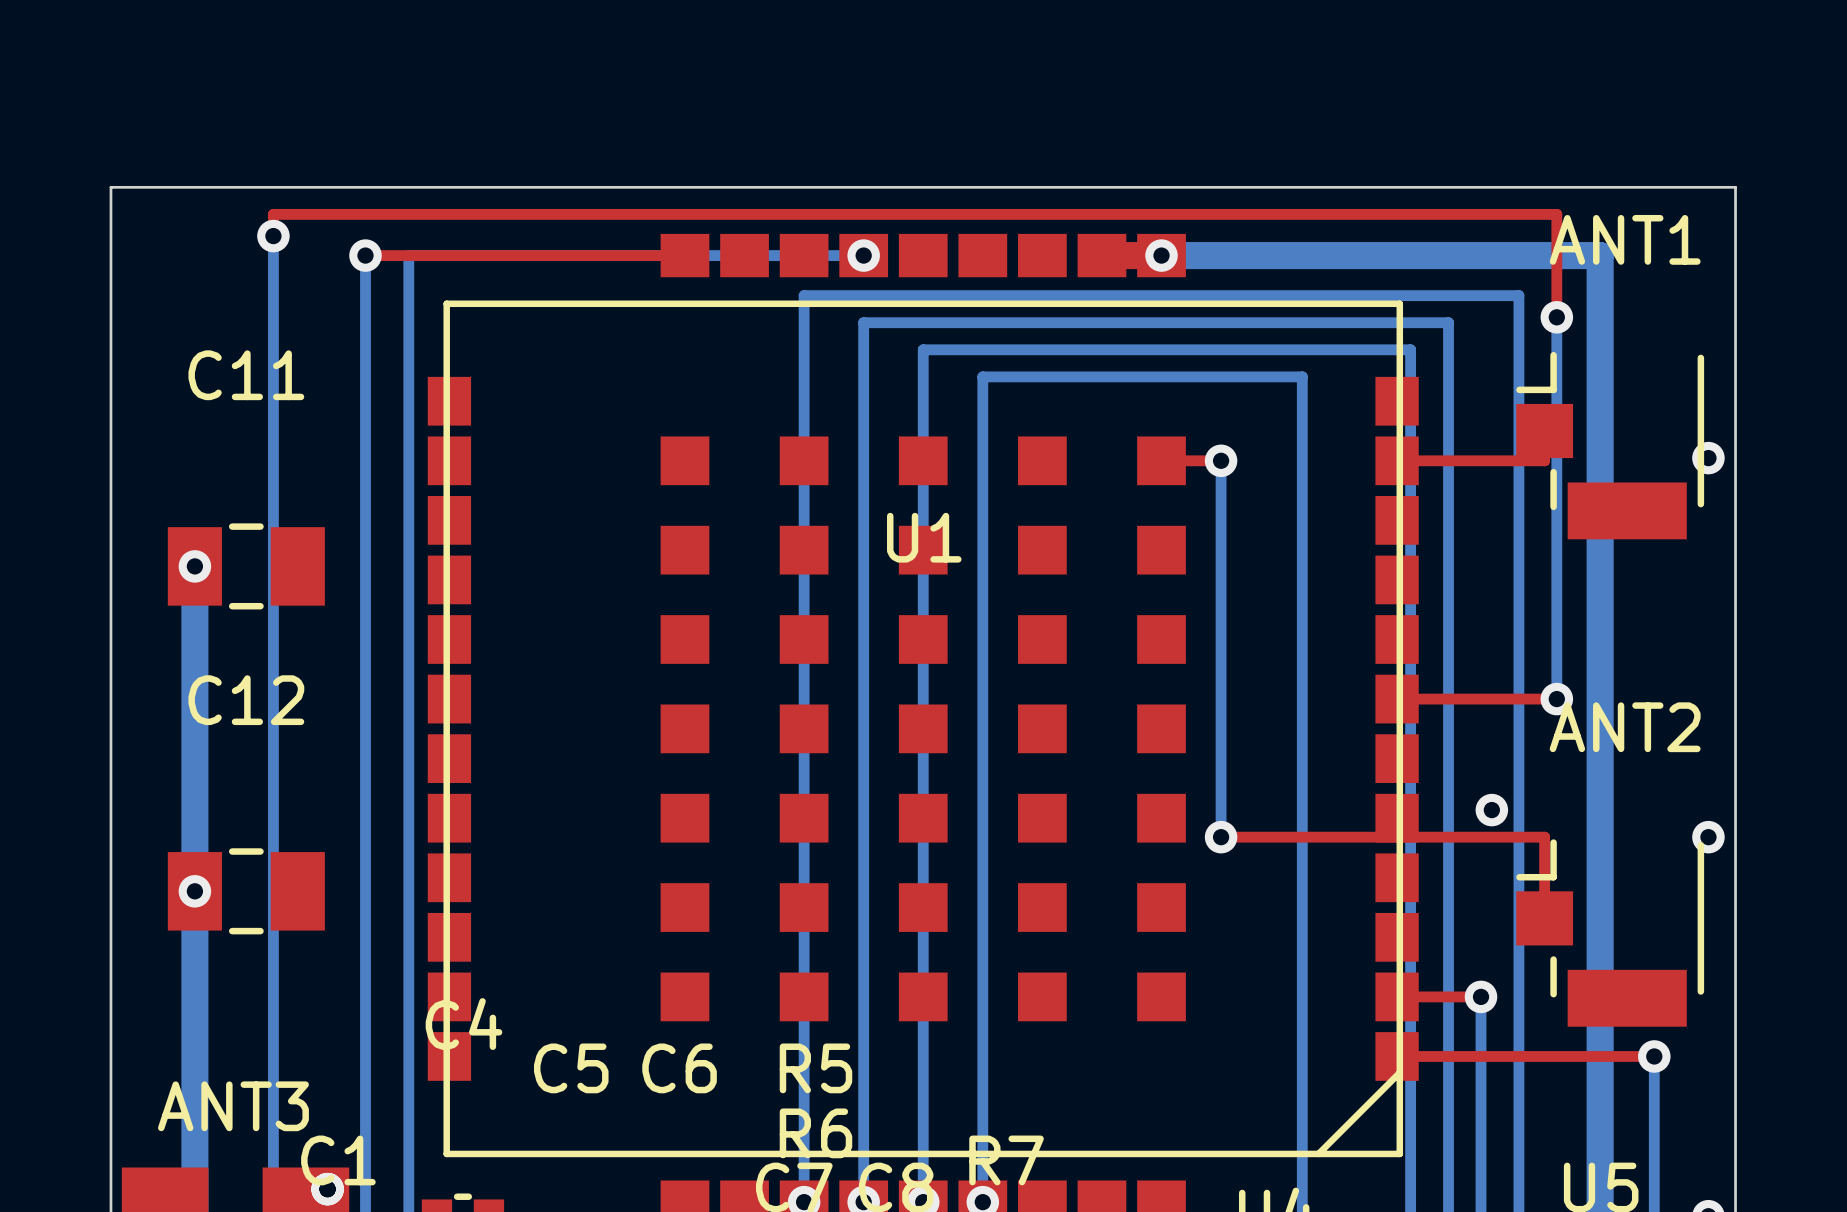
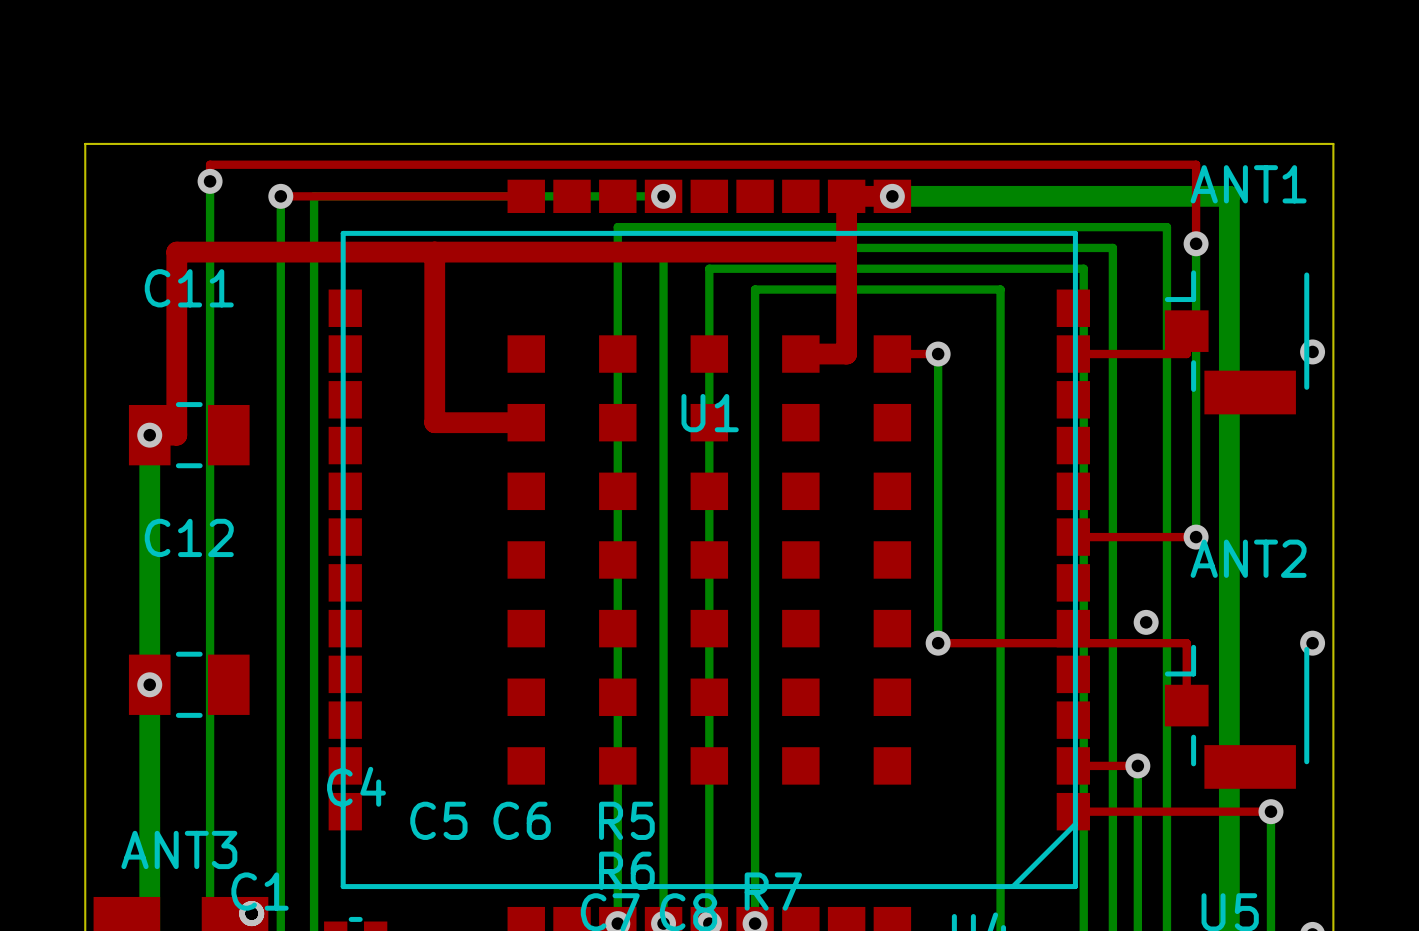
top track: none -> (846, 196) (846, 354) (800, 354)
top track: none -> (434, 252) (434, 422) (526, 422)
top track: none -> (846, 252) (176, 252) (176, 435) (149, 435)

